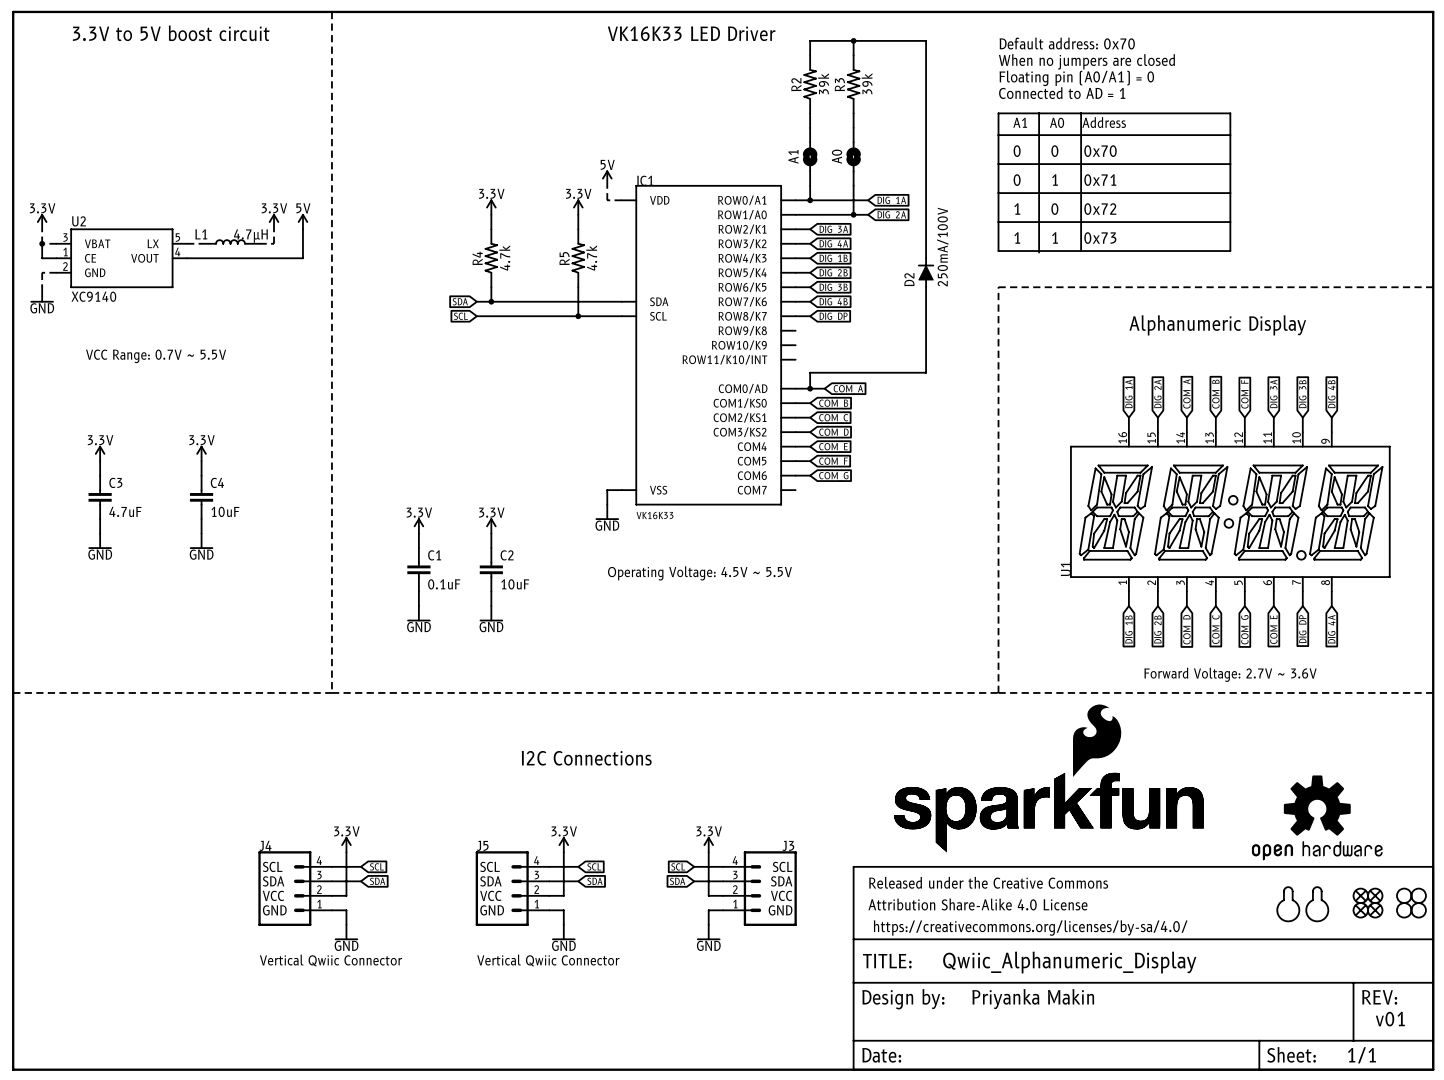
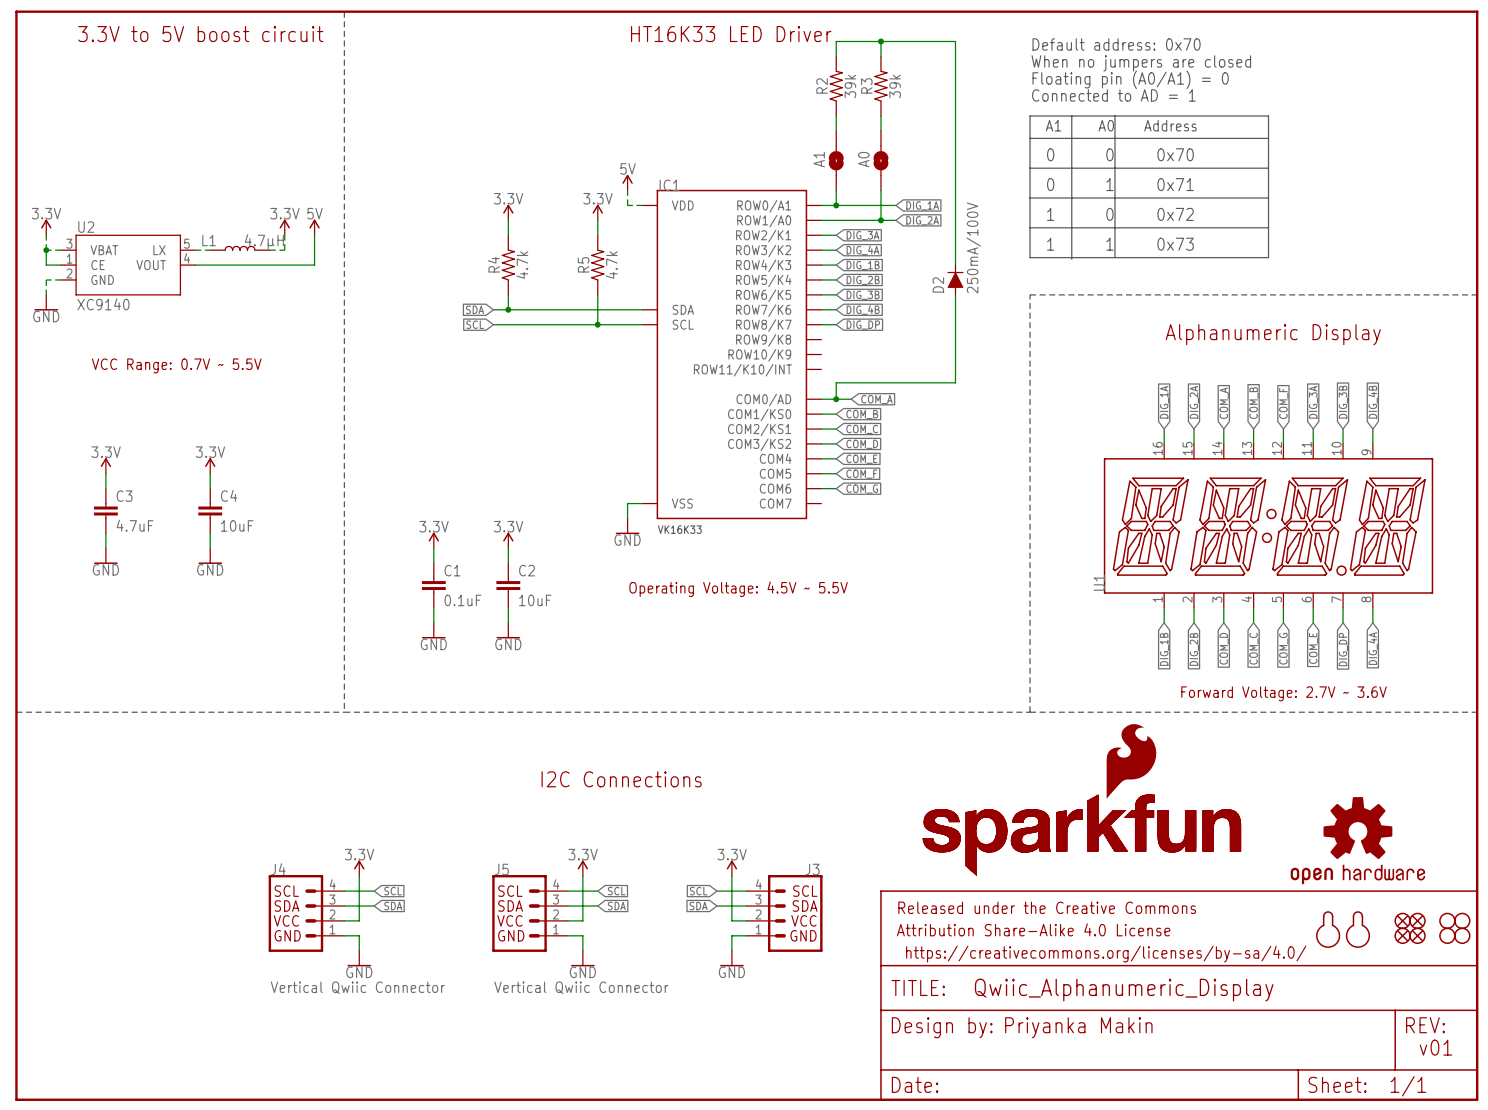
text: VK16K33 LED Driver (691, 33) -> HT16K33 LED Driver (731, 34)

